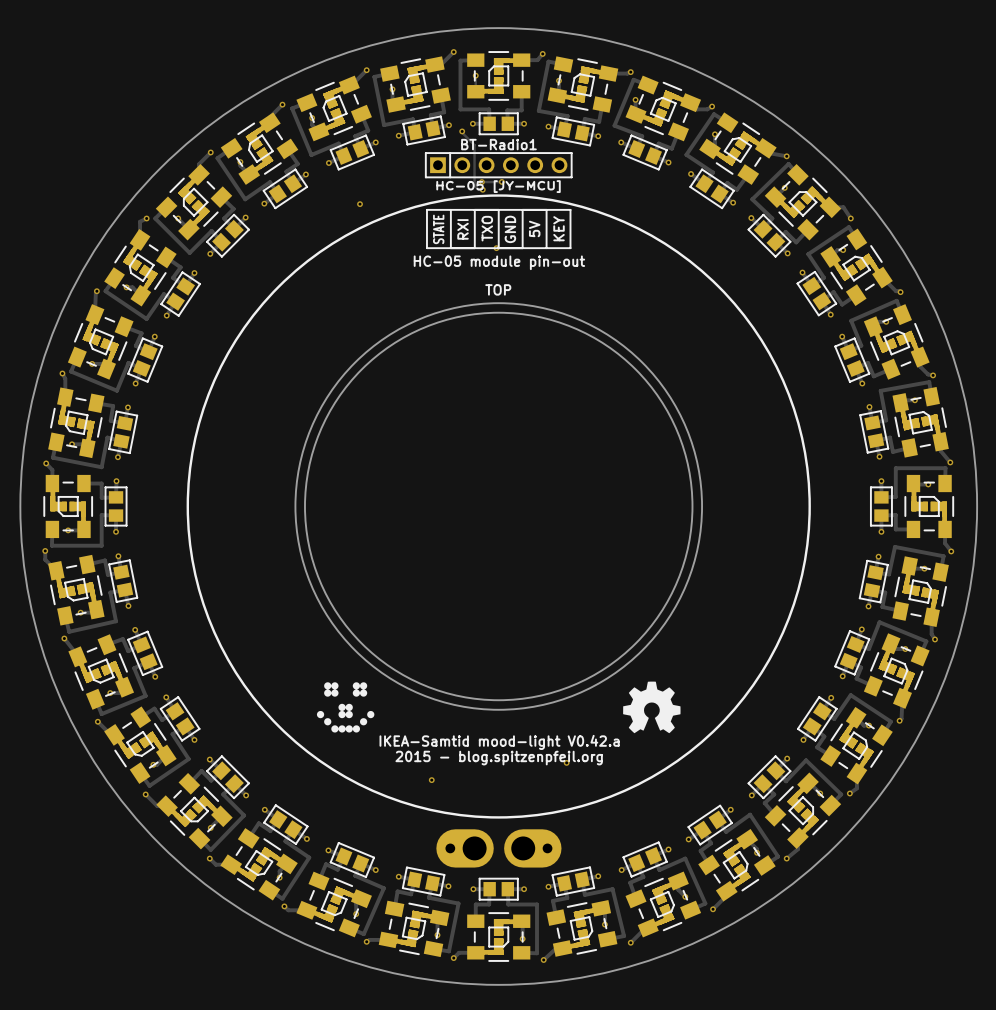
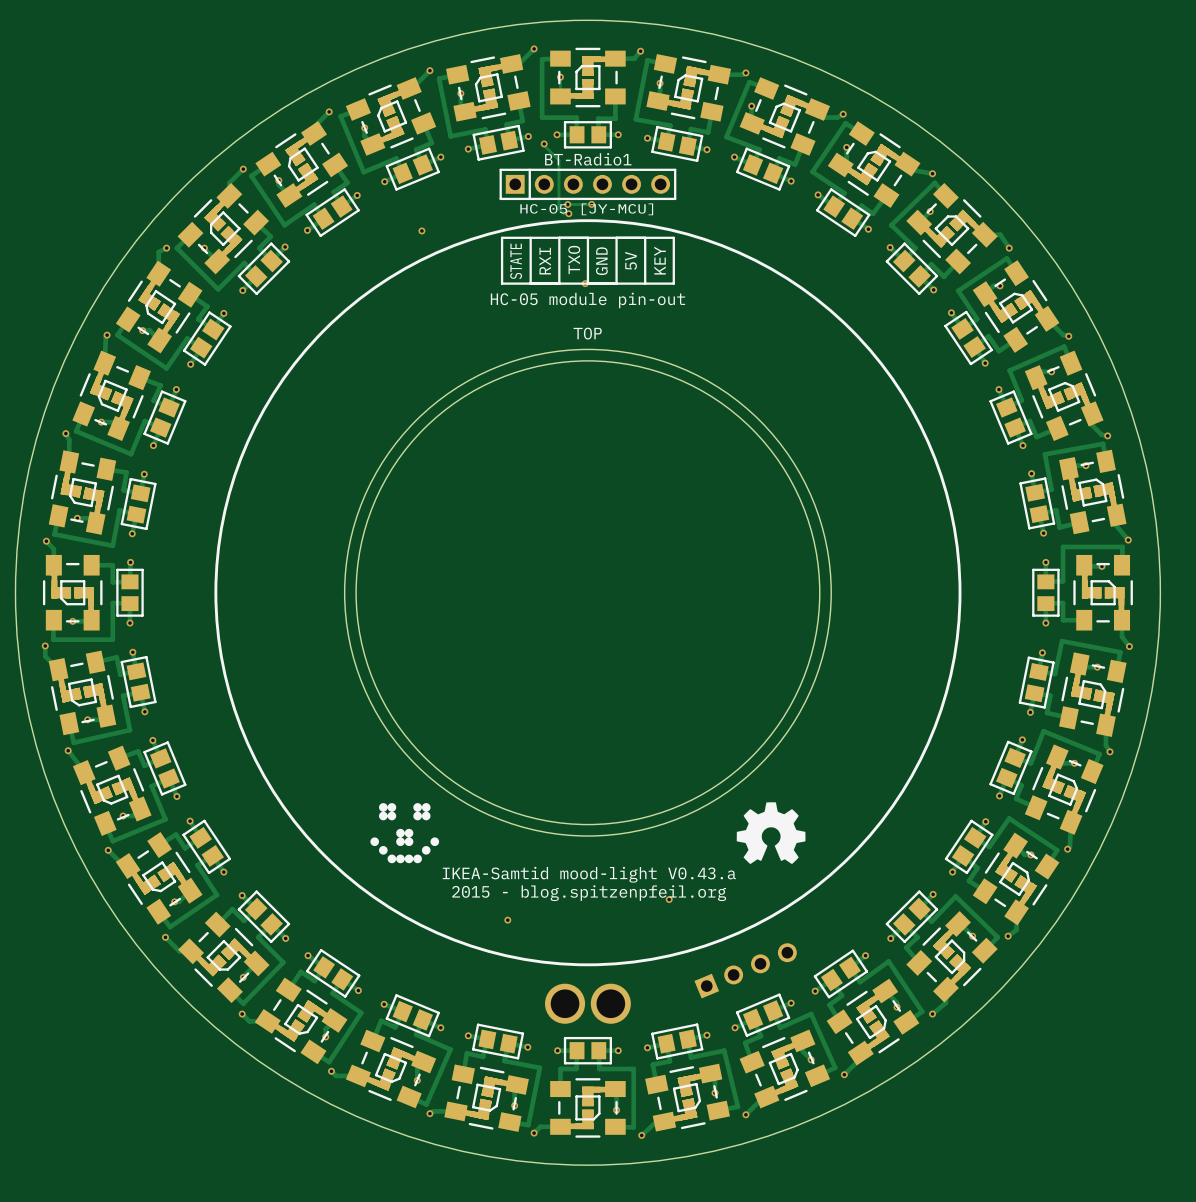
text: IKEA-Samtid mood-light V0.42.a (499, 742) -> IKEA-Samtid mood-light V0.43.a (589, 874)
part: none -> (745, 970)
part footprint: [436, 829, 562, 868] -> [545, 983, 631, 1024]

